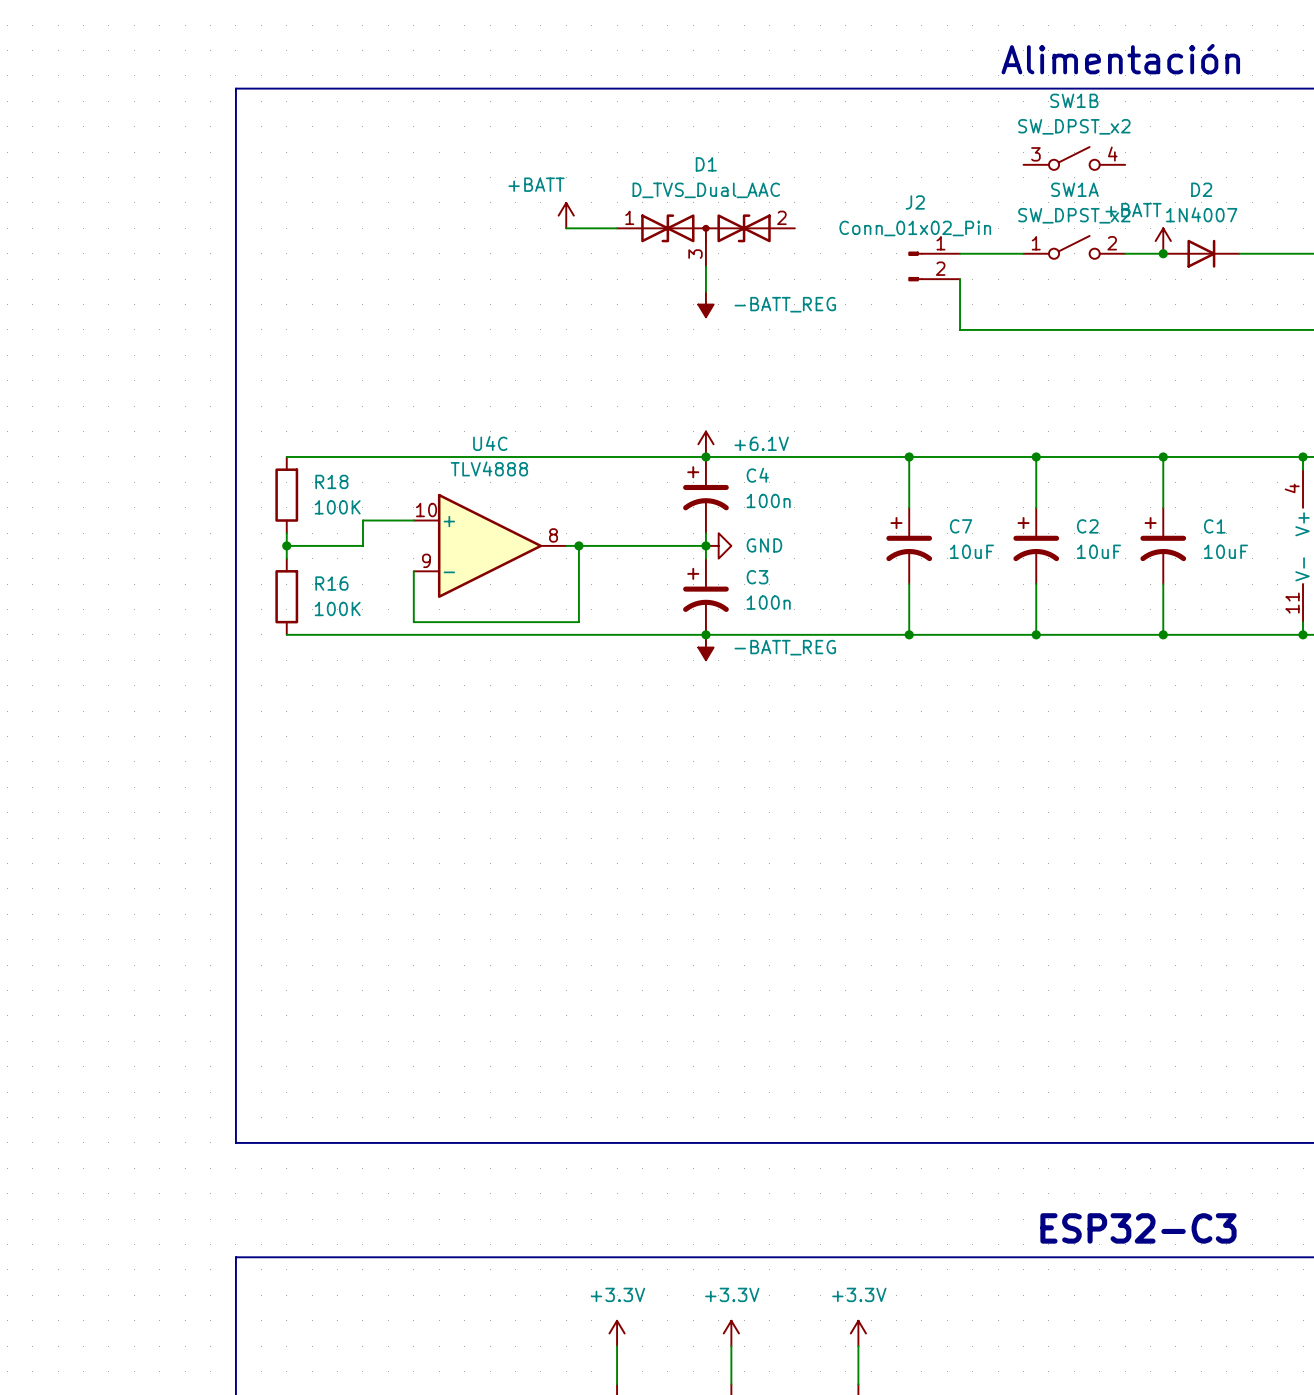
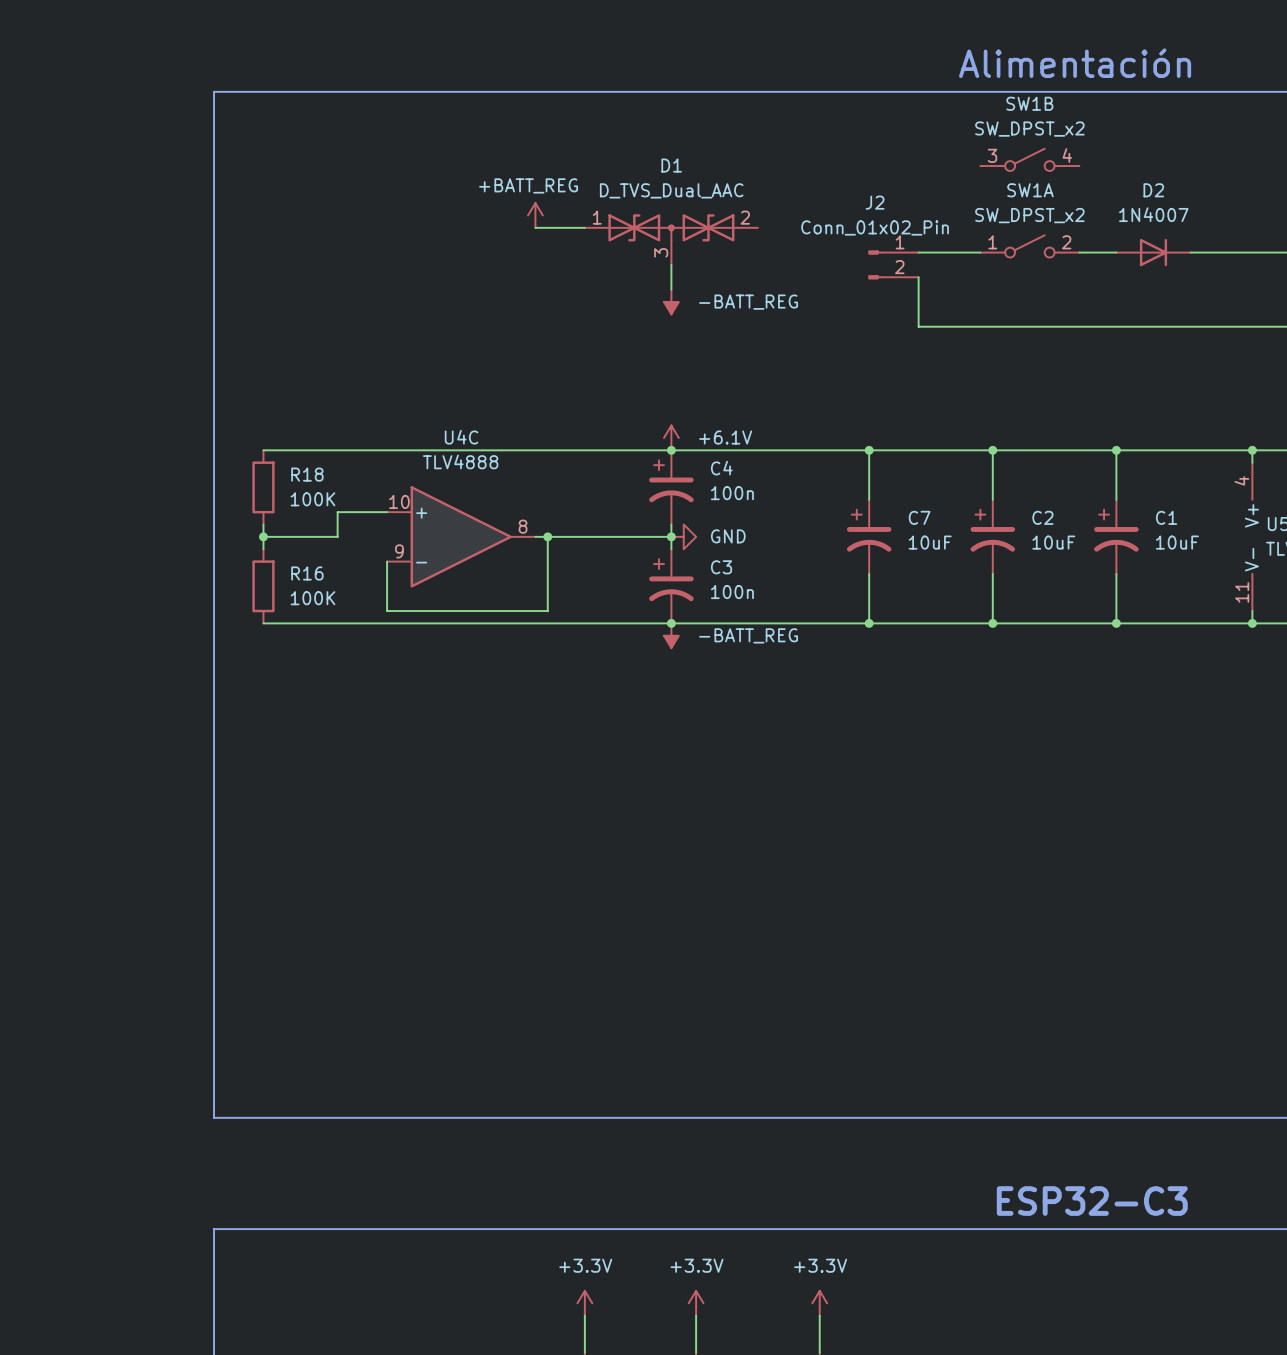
power symbol: +BATT (566, 215) -> +BATT_REG (535, 215)
power symbol: +BATT (1163, 241) -> none
junction: (1163, 253) -> none

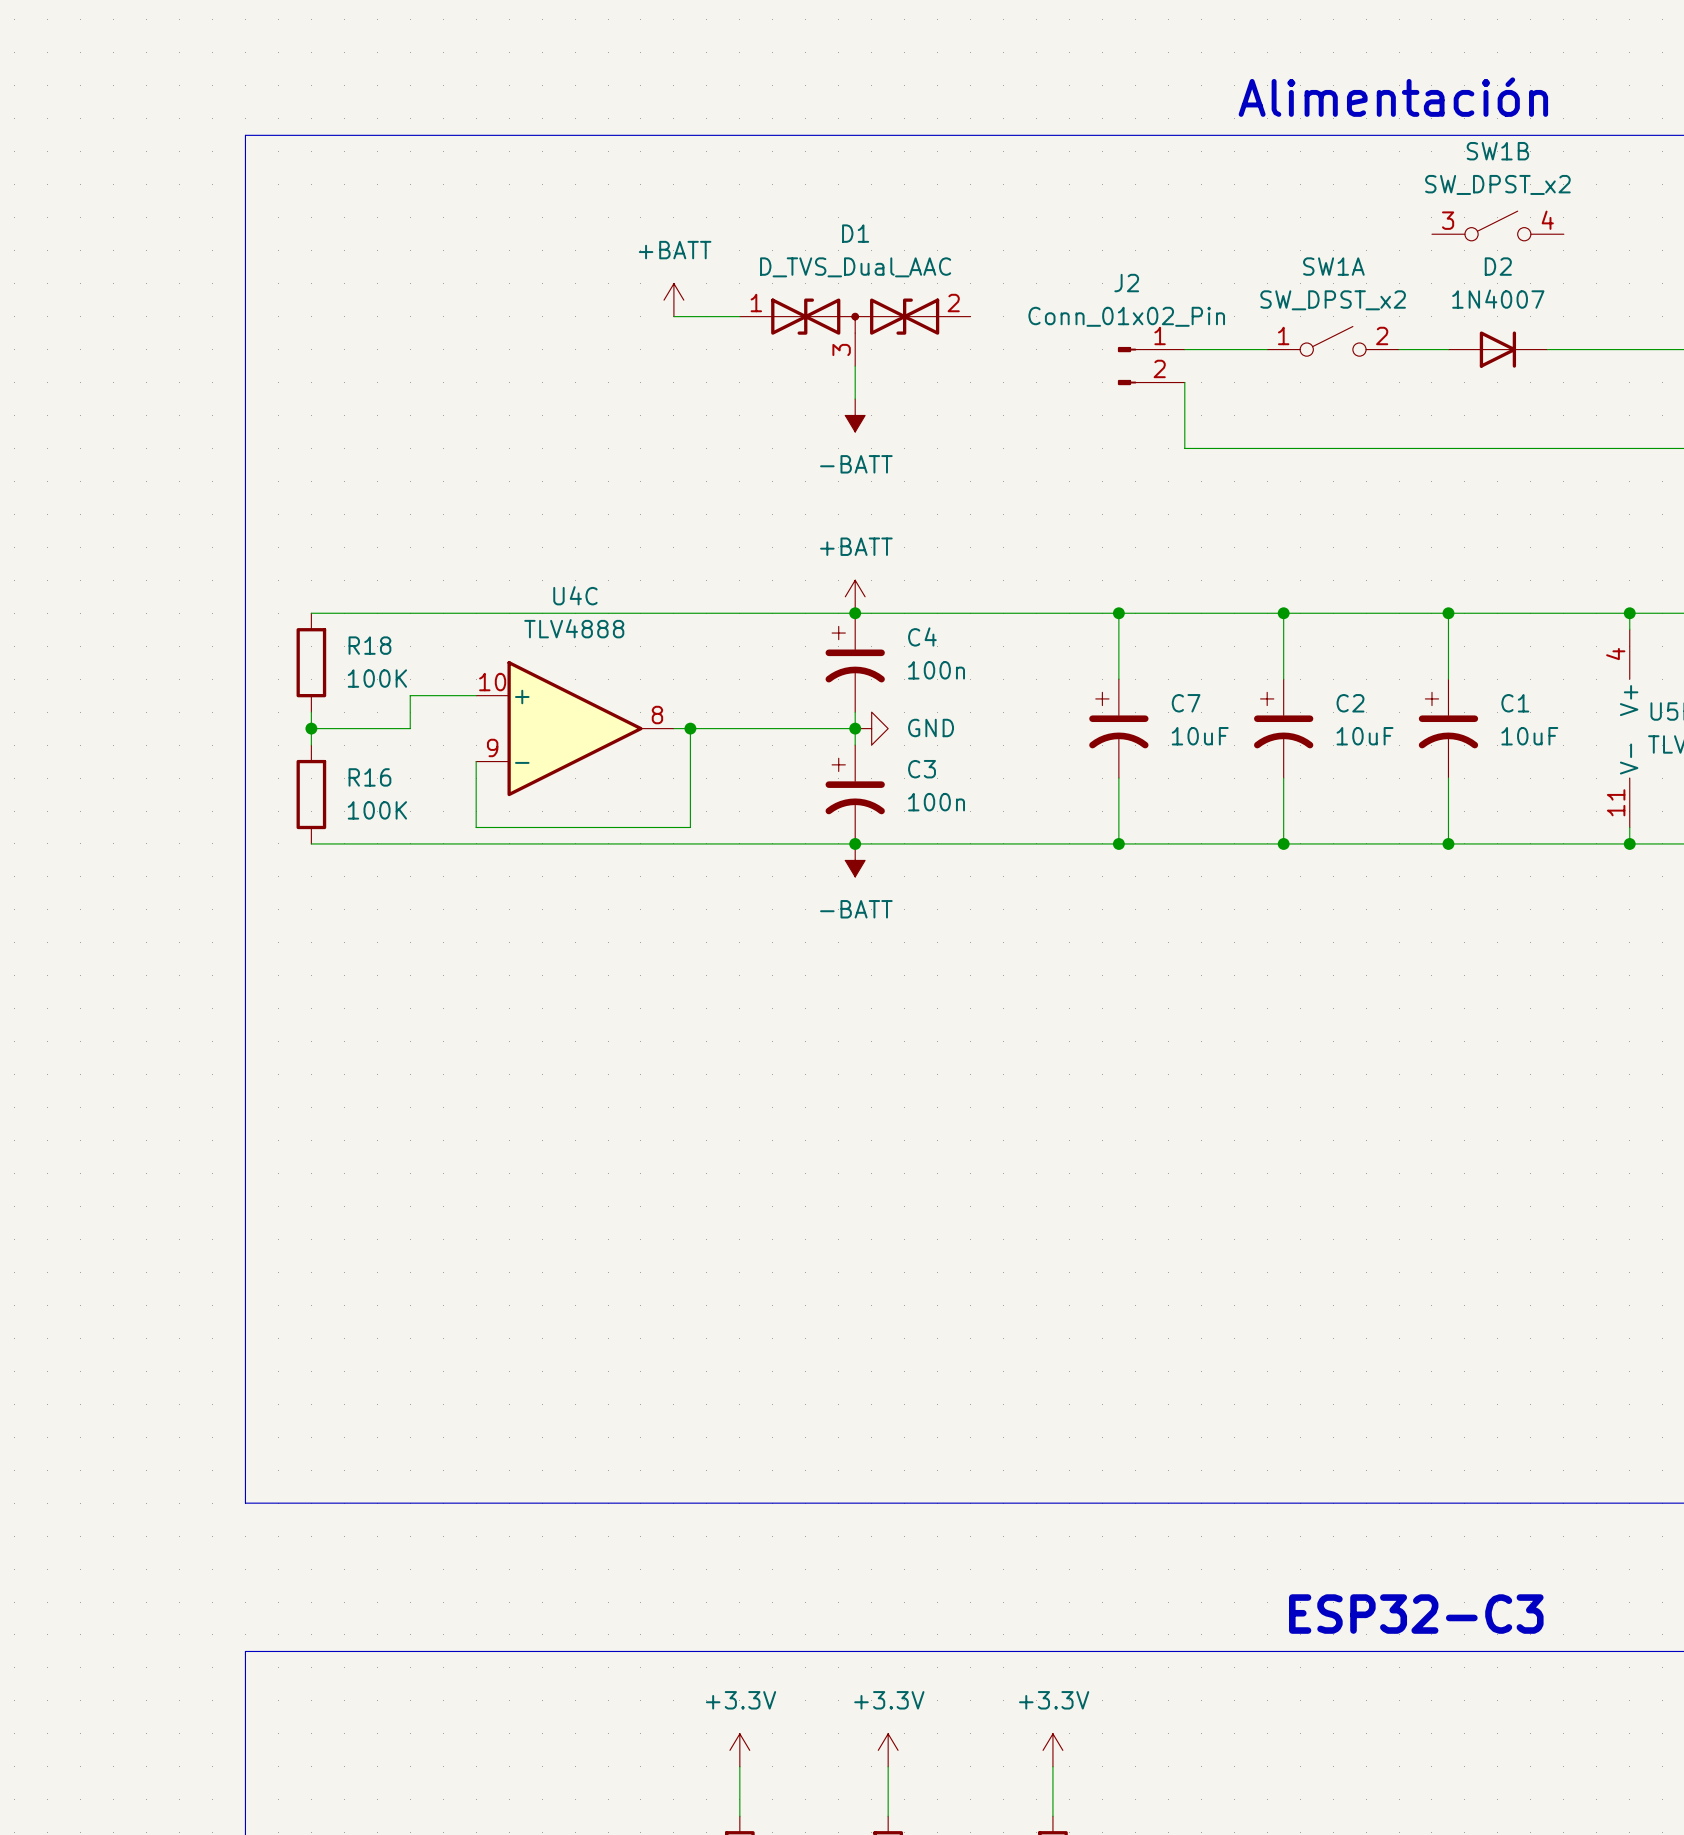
SW1B position: (1029, 159) -> (1497, 225)
power symbol: +BATT_REG (535, 215) -> +BATT (673, 300)
power symbol: -BATT_REG (671, 302) -> -BATT (855, 415)
power symbol: +6.1V (671, 437) -> +BATT (855, 596)
power symbol: -BATT_REG (671, 635) -> -BATT (855, 860)

